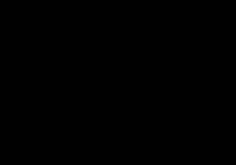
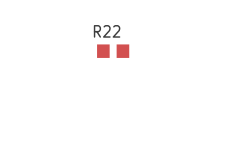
R22: none -> (113, 51)

